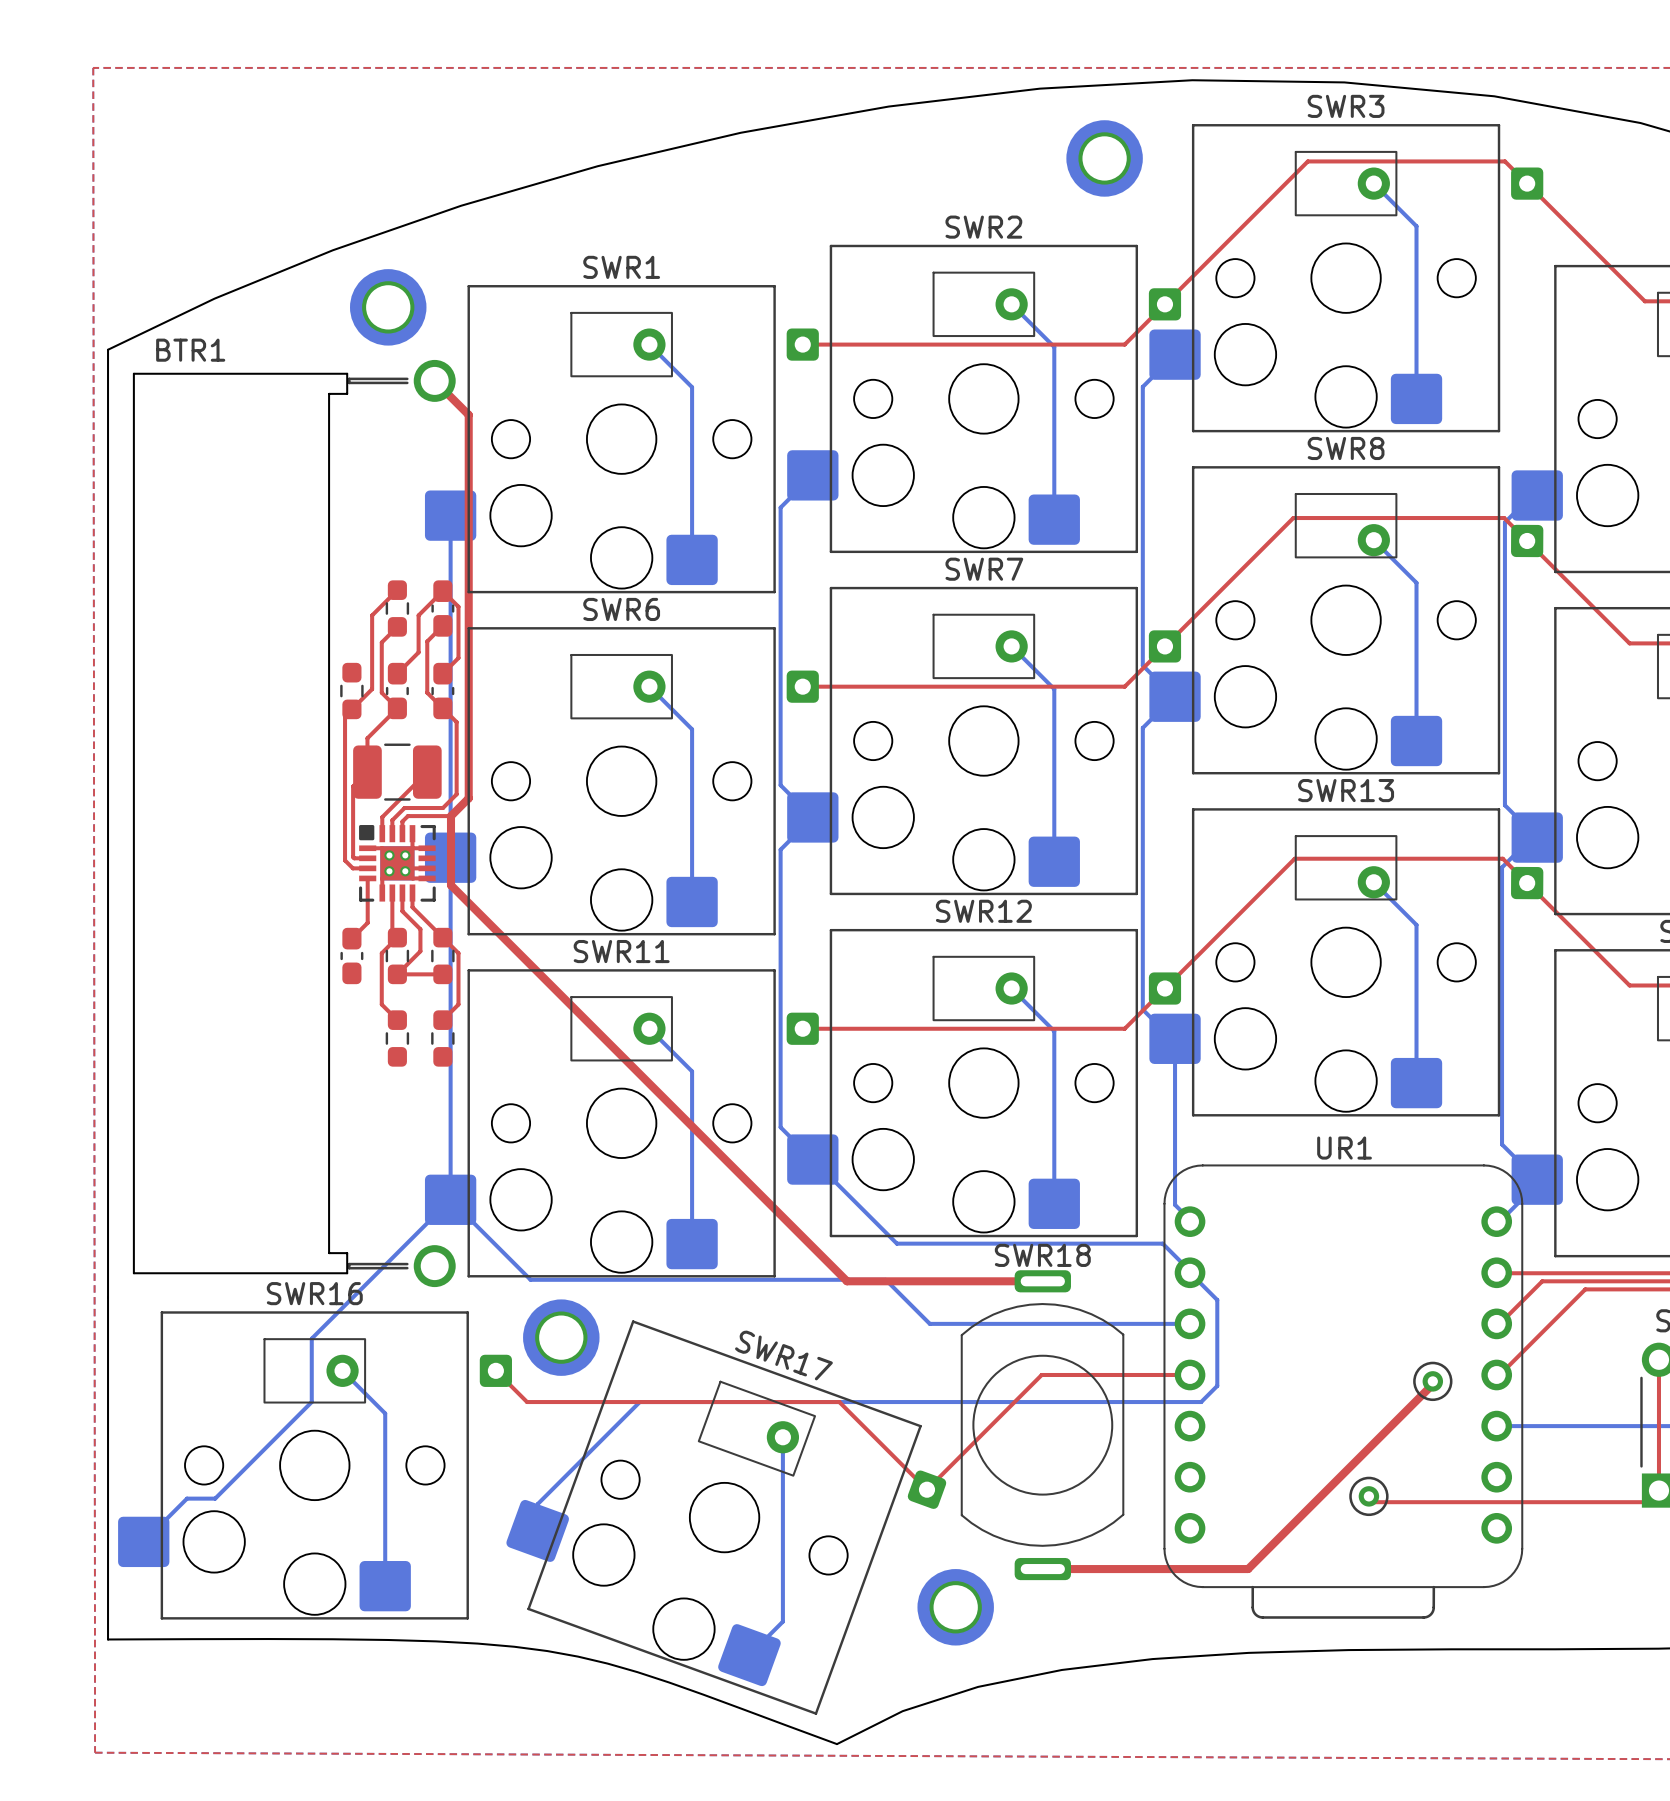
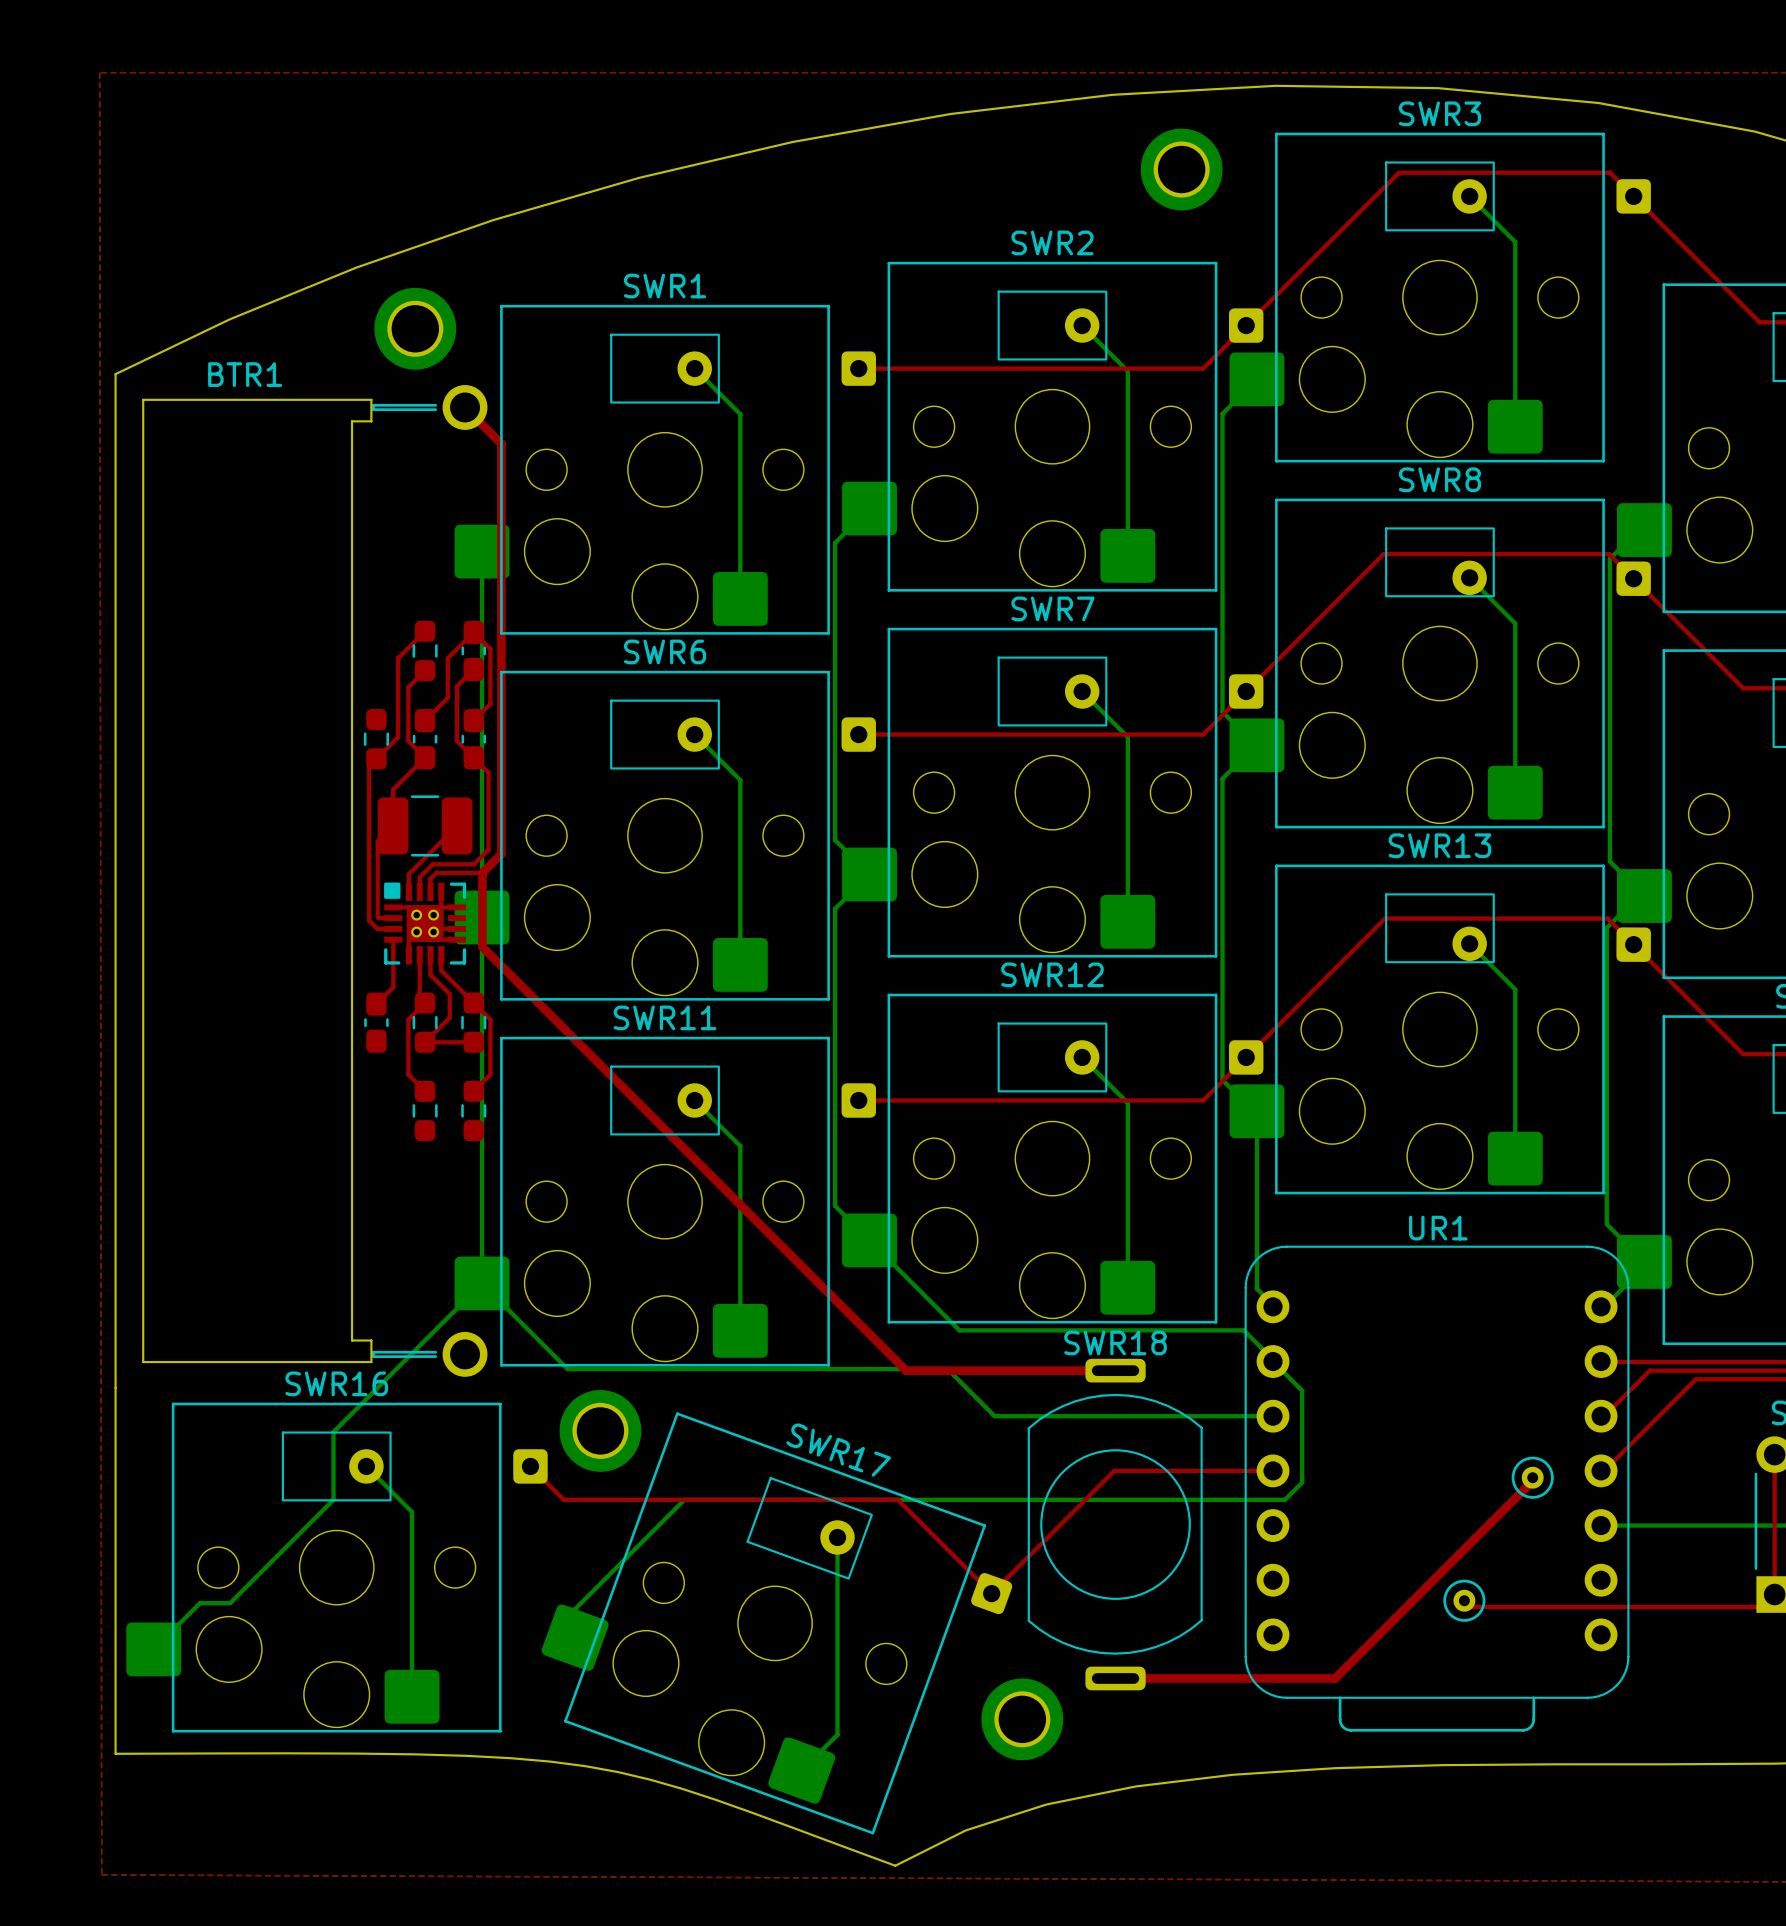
BTR1 name position: BTR1 (190, 350) -> BTR1 (245, 374)

